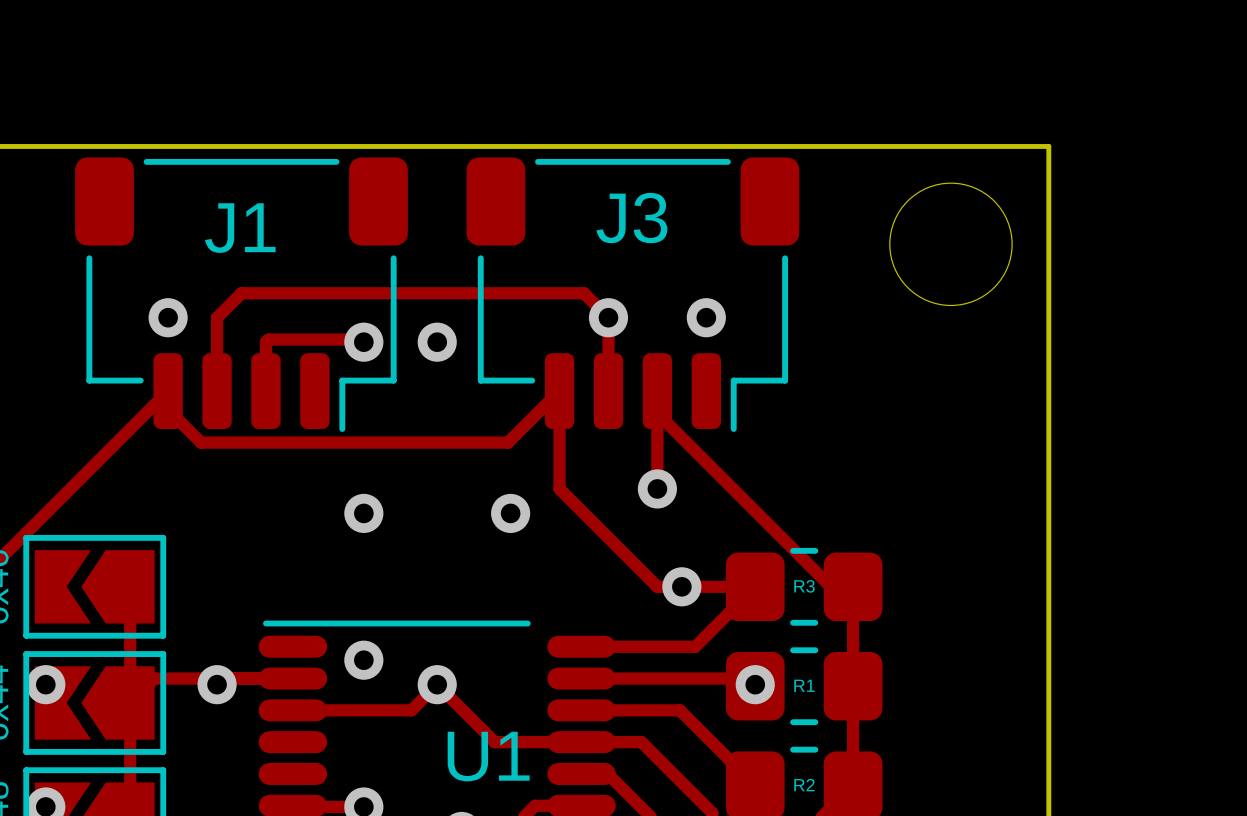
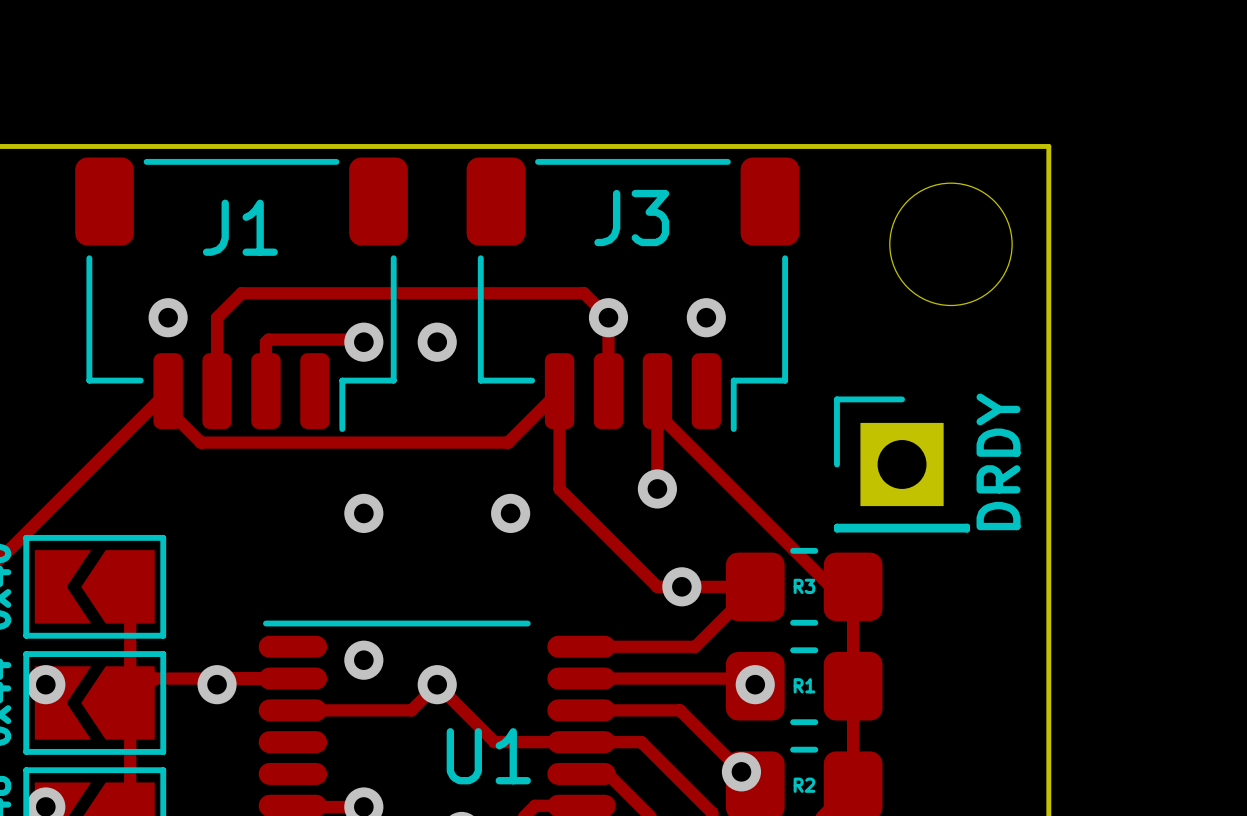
part: none -> DRDY (902, 464)
via: none -> (741, 771)

